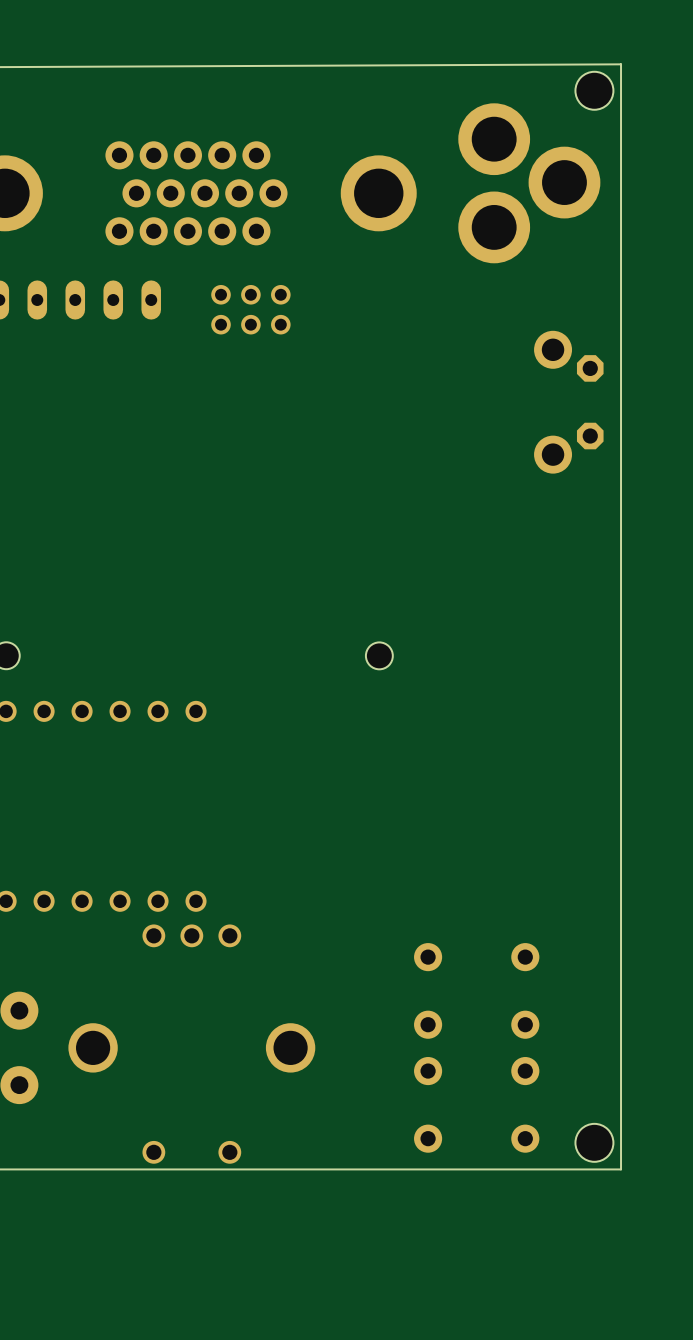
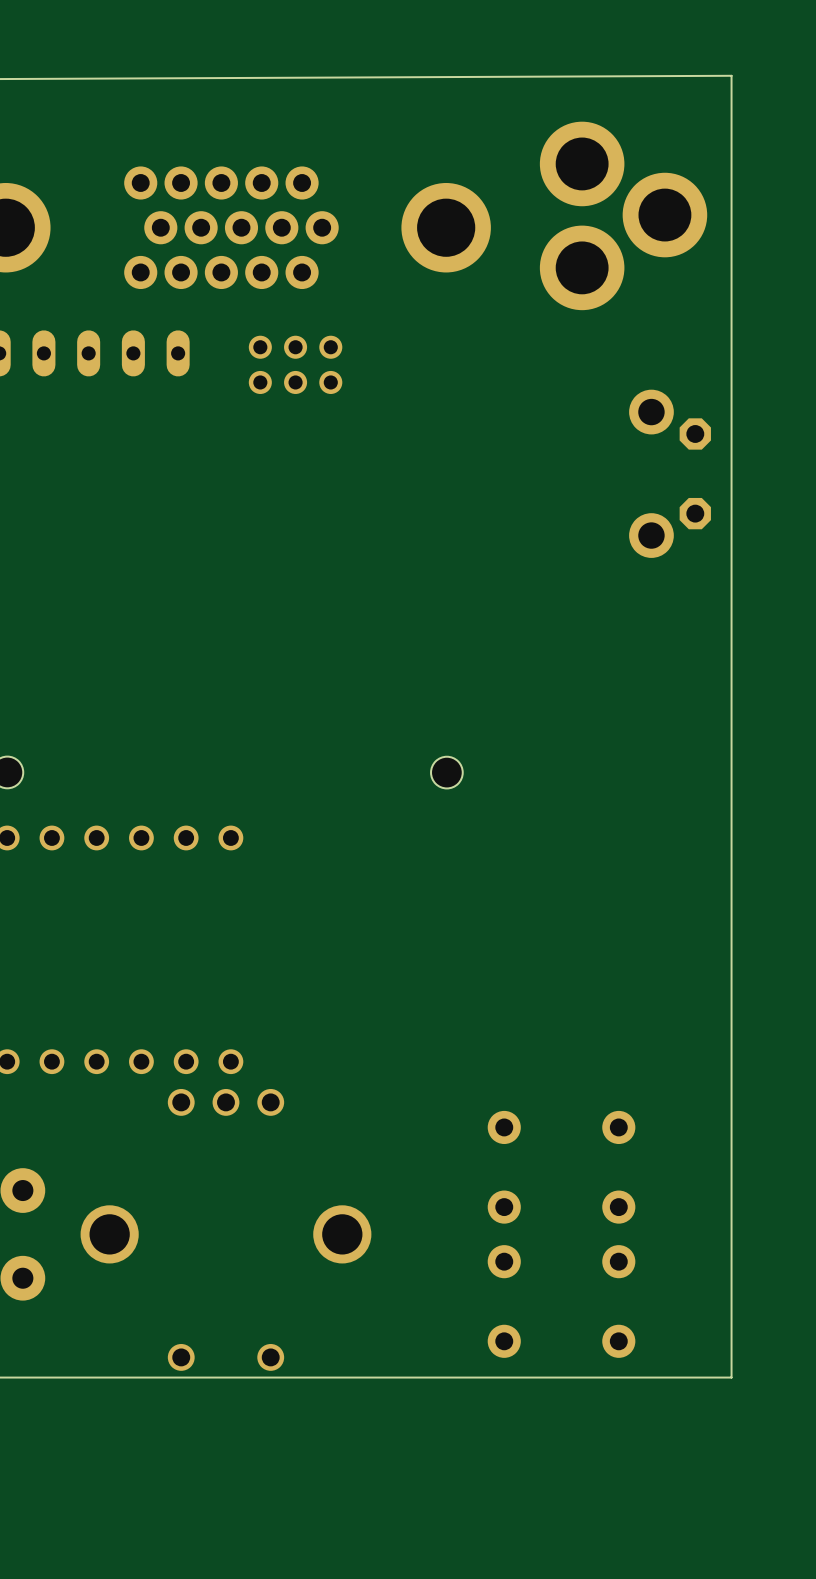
hole: (594, 90) -> none
hole: (594, 1142) -> none

